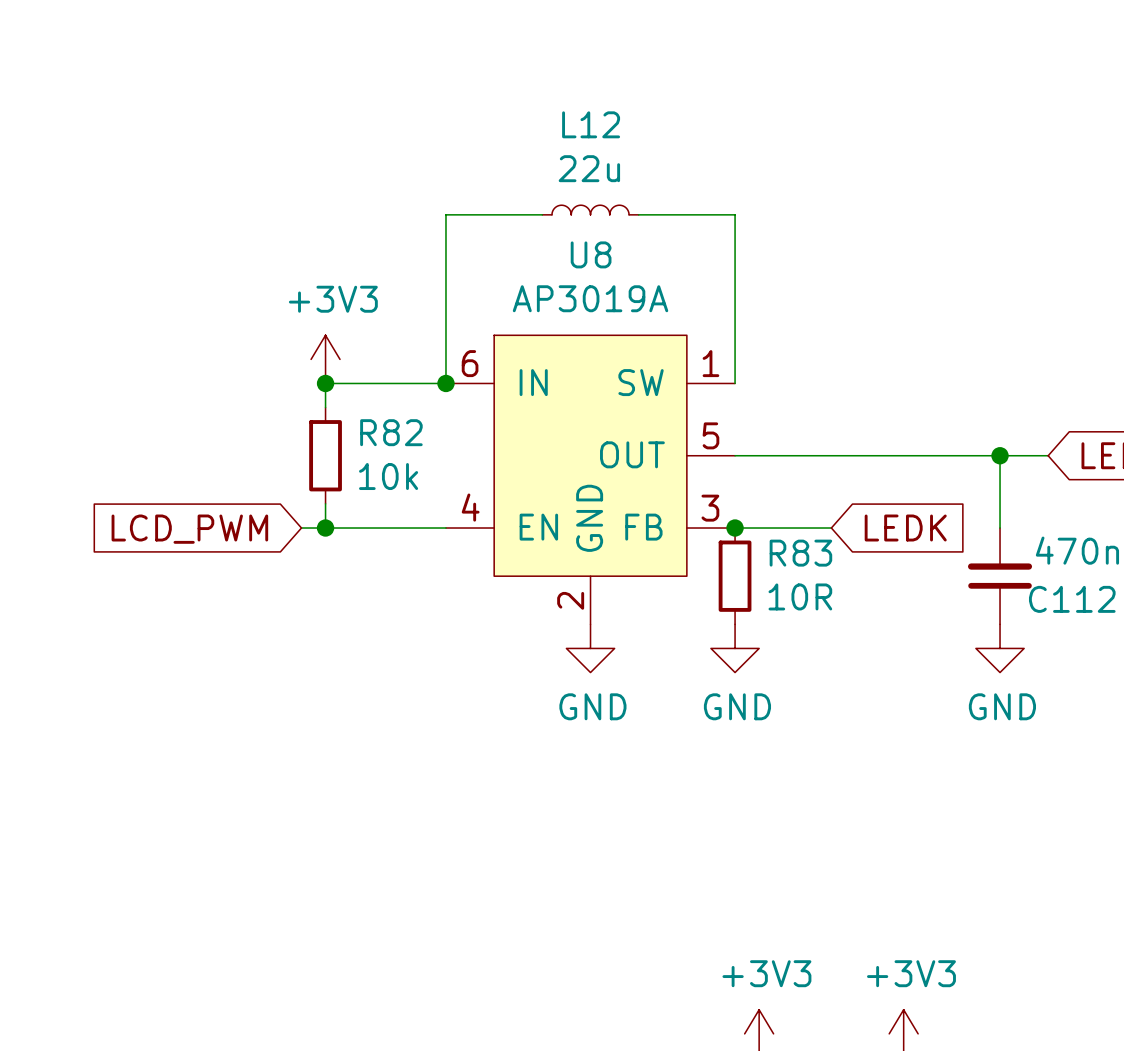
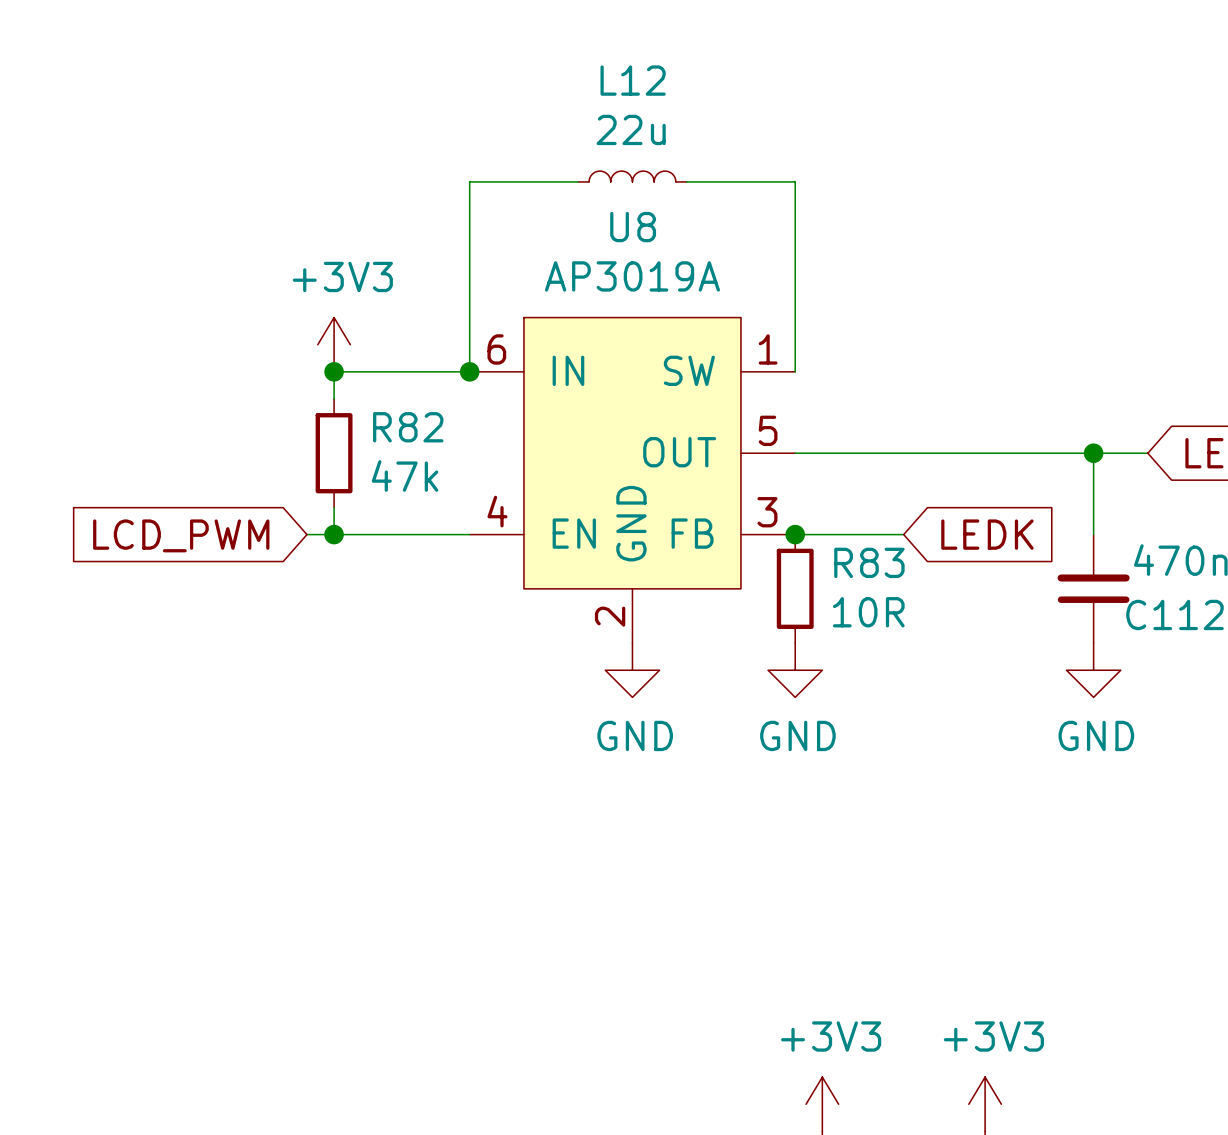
R82 value: 10k (388, 476) -> 47k (405, 475)

